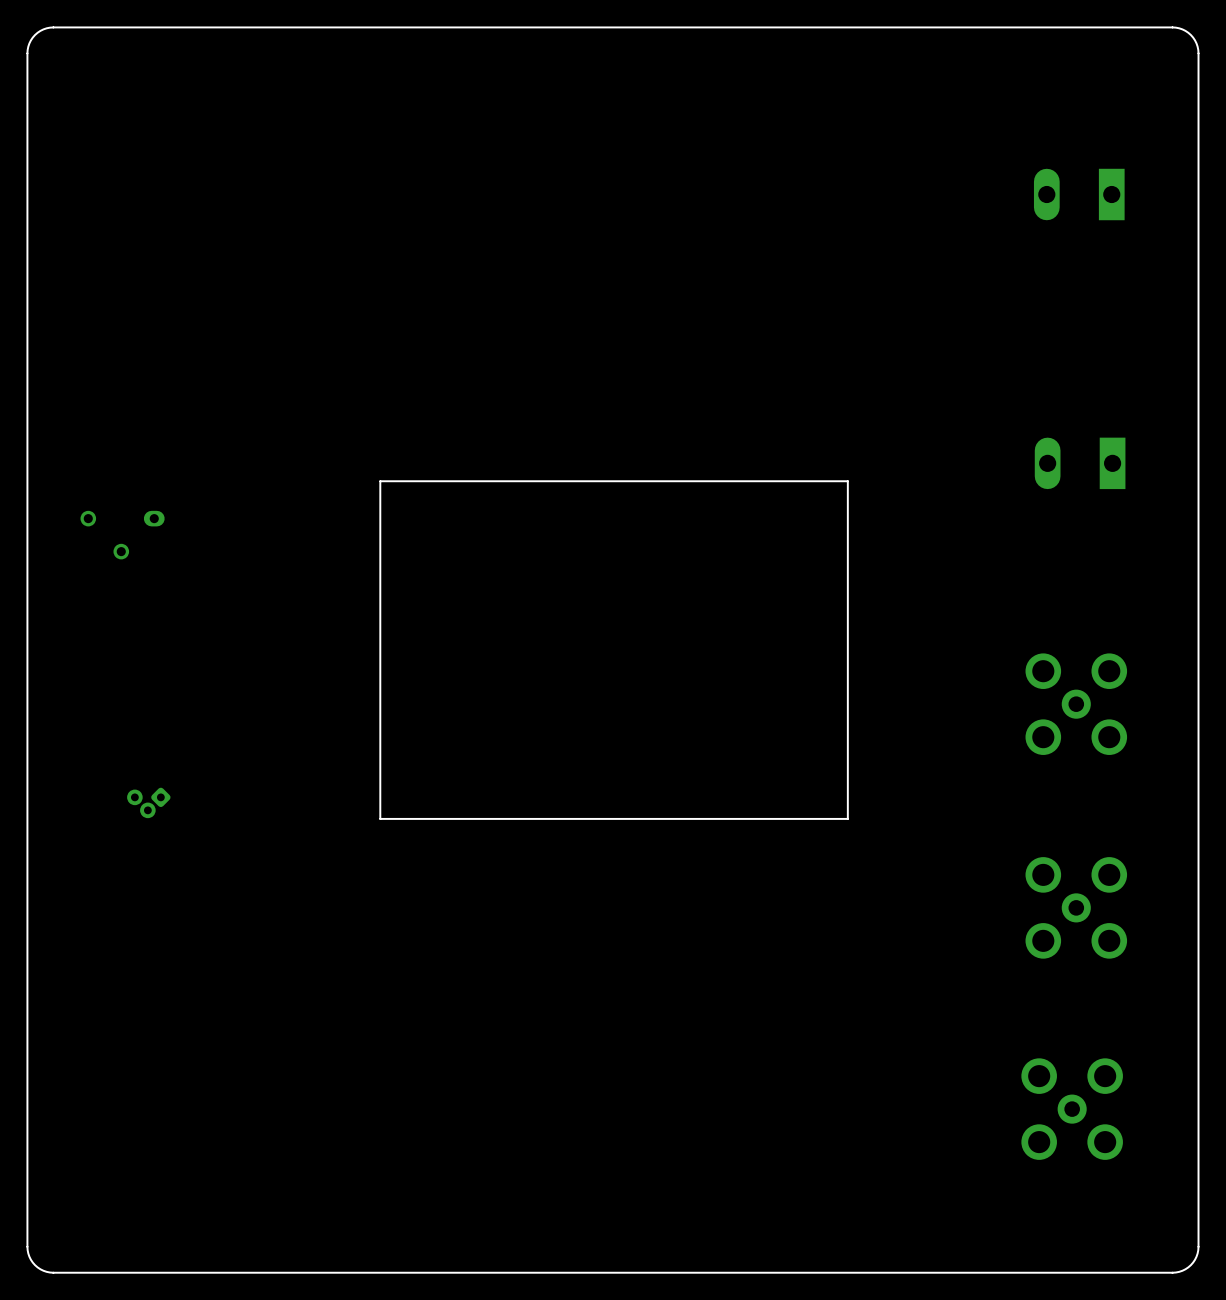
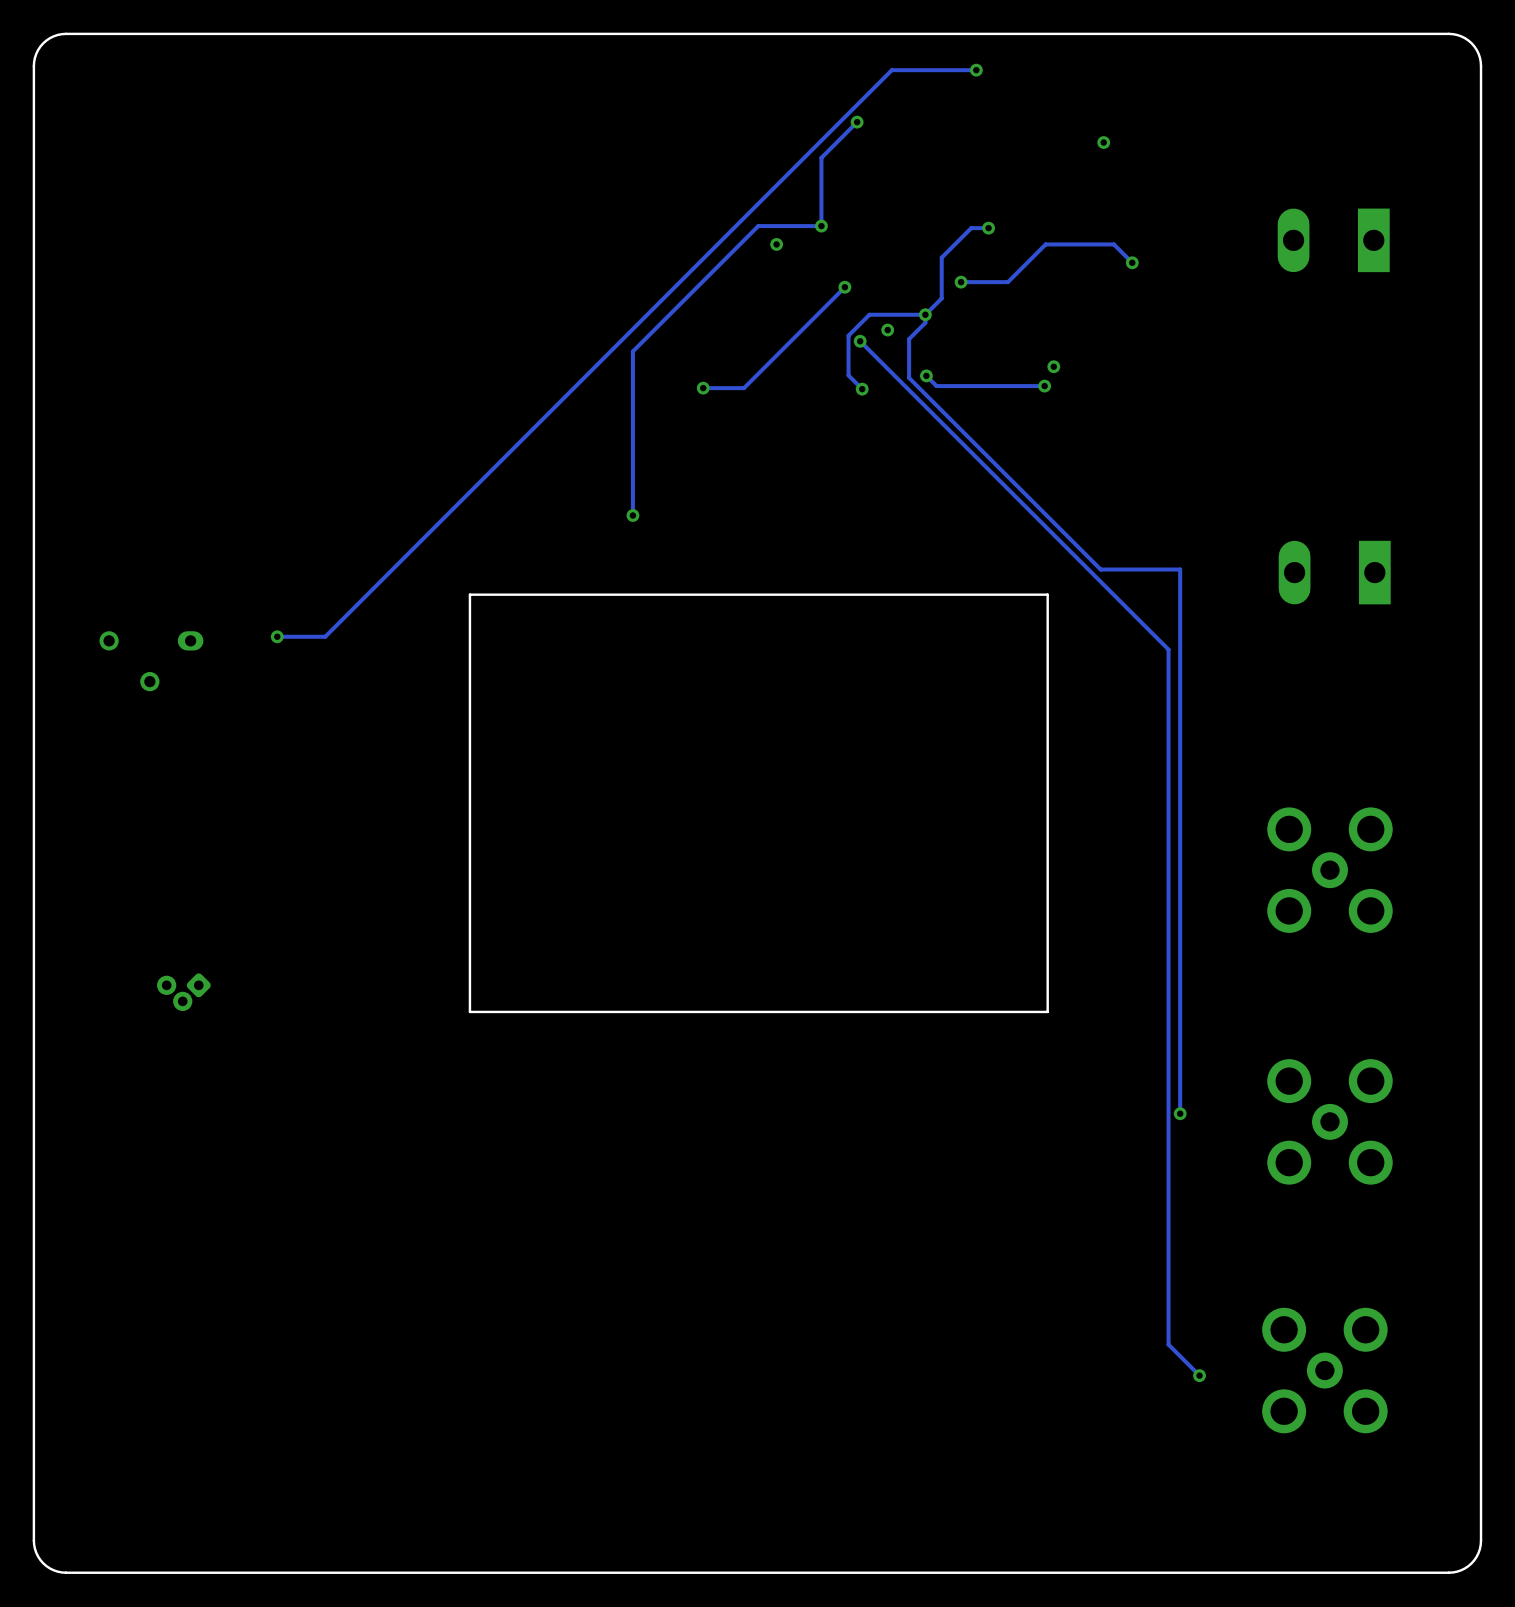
track: none -> (976, 70) (891, 70) (325, 636) (277, 636)
via: none -> (976, 70)
track: none -> (857, 122) (821, 157) (821, 226) (758, 226) (632, 351) (632, 515)
via: none -> (857, 122)
via: none -> (1103, 142)
via: none -> (821, 226)
track: none -> (988, 228) (971, 228) (941, 257) (941, 298) (925, 314)
via: none -> (988, 228)
via: none -> (776, 244)
track: none -> (1132, 262) (1113, 244) (1045, 244) (1007, 282) (961, 282)
via: none -> (1132, 262)
via: none -> (961, 282)
track: none -> (844, 287) (744, 388) (703, 388)
via: none -> (844, 287)
track: none -> (925, 314) (925, 322) (909, 339) (909, 377) (1100, 569) (1180, 569) (1180, 1113)
track: none -> (925, 314) (869, 314) (848, 335) (848, 375) (862, 389)
via: none -> (925, 314)
via: none -> (887, 330)
track: none -> (860, 341) (1168, 649) (1168, 1344) (1199, 1375)
via: none -> (860, 341)
via: none -> (1053, 366)
track: none -> (926, 375) (936, 386) (1044, 386)
via: none -> (926, 375)
via: none -> (1044, 386)
via: none -> (703, 388)
via: none -> (862, 389)
via: none -> (632, 515)
via: none -> (277, 636)
via: none -> (1180, 1113)
via: none -> (1199, 1375)

